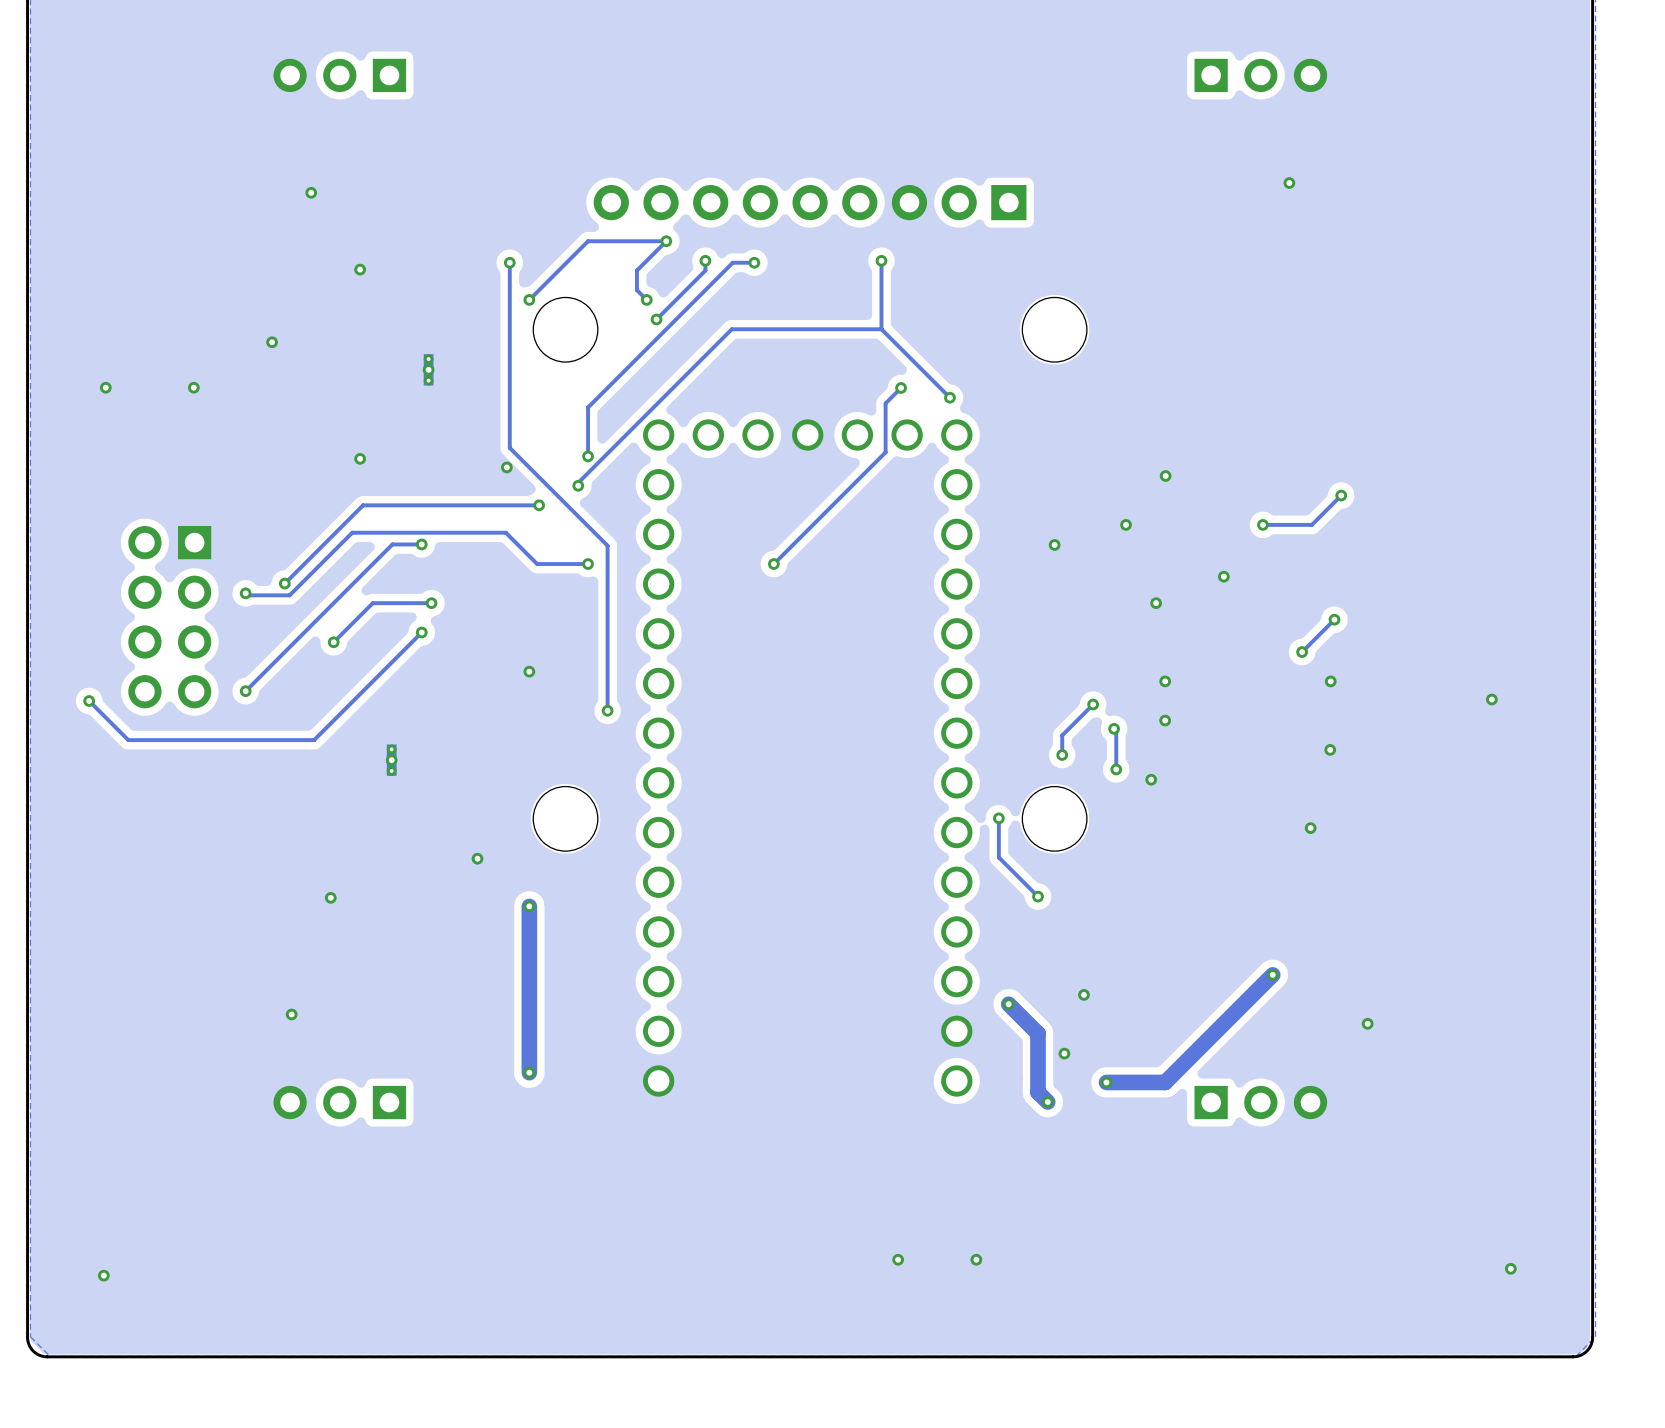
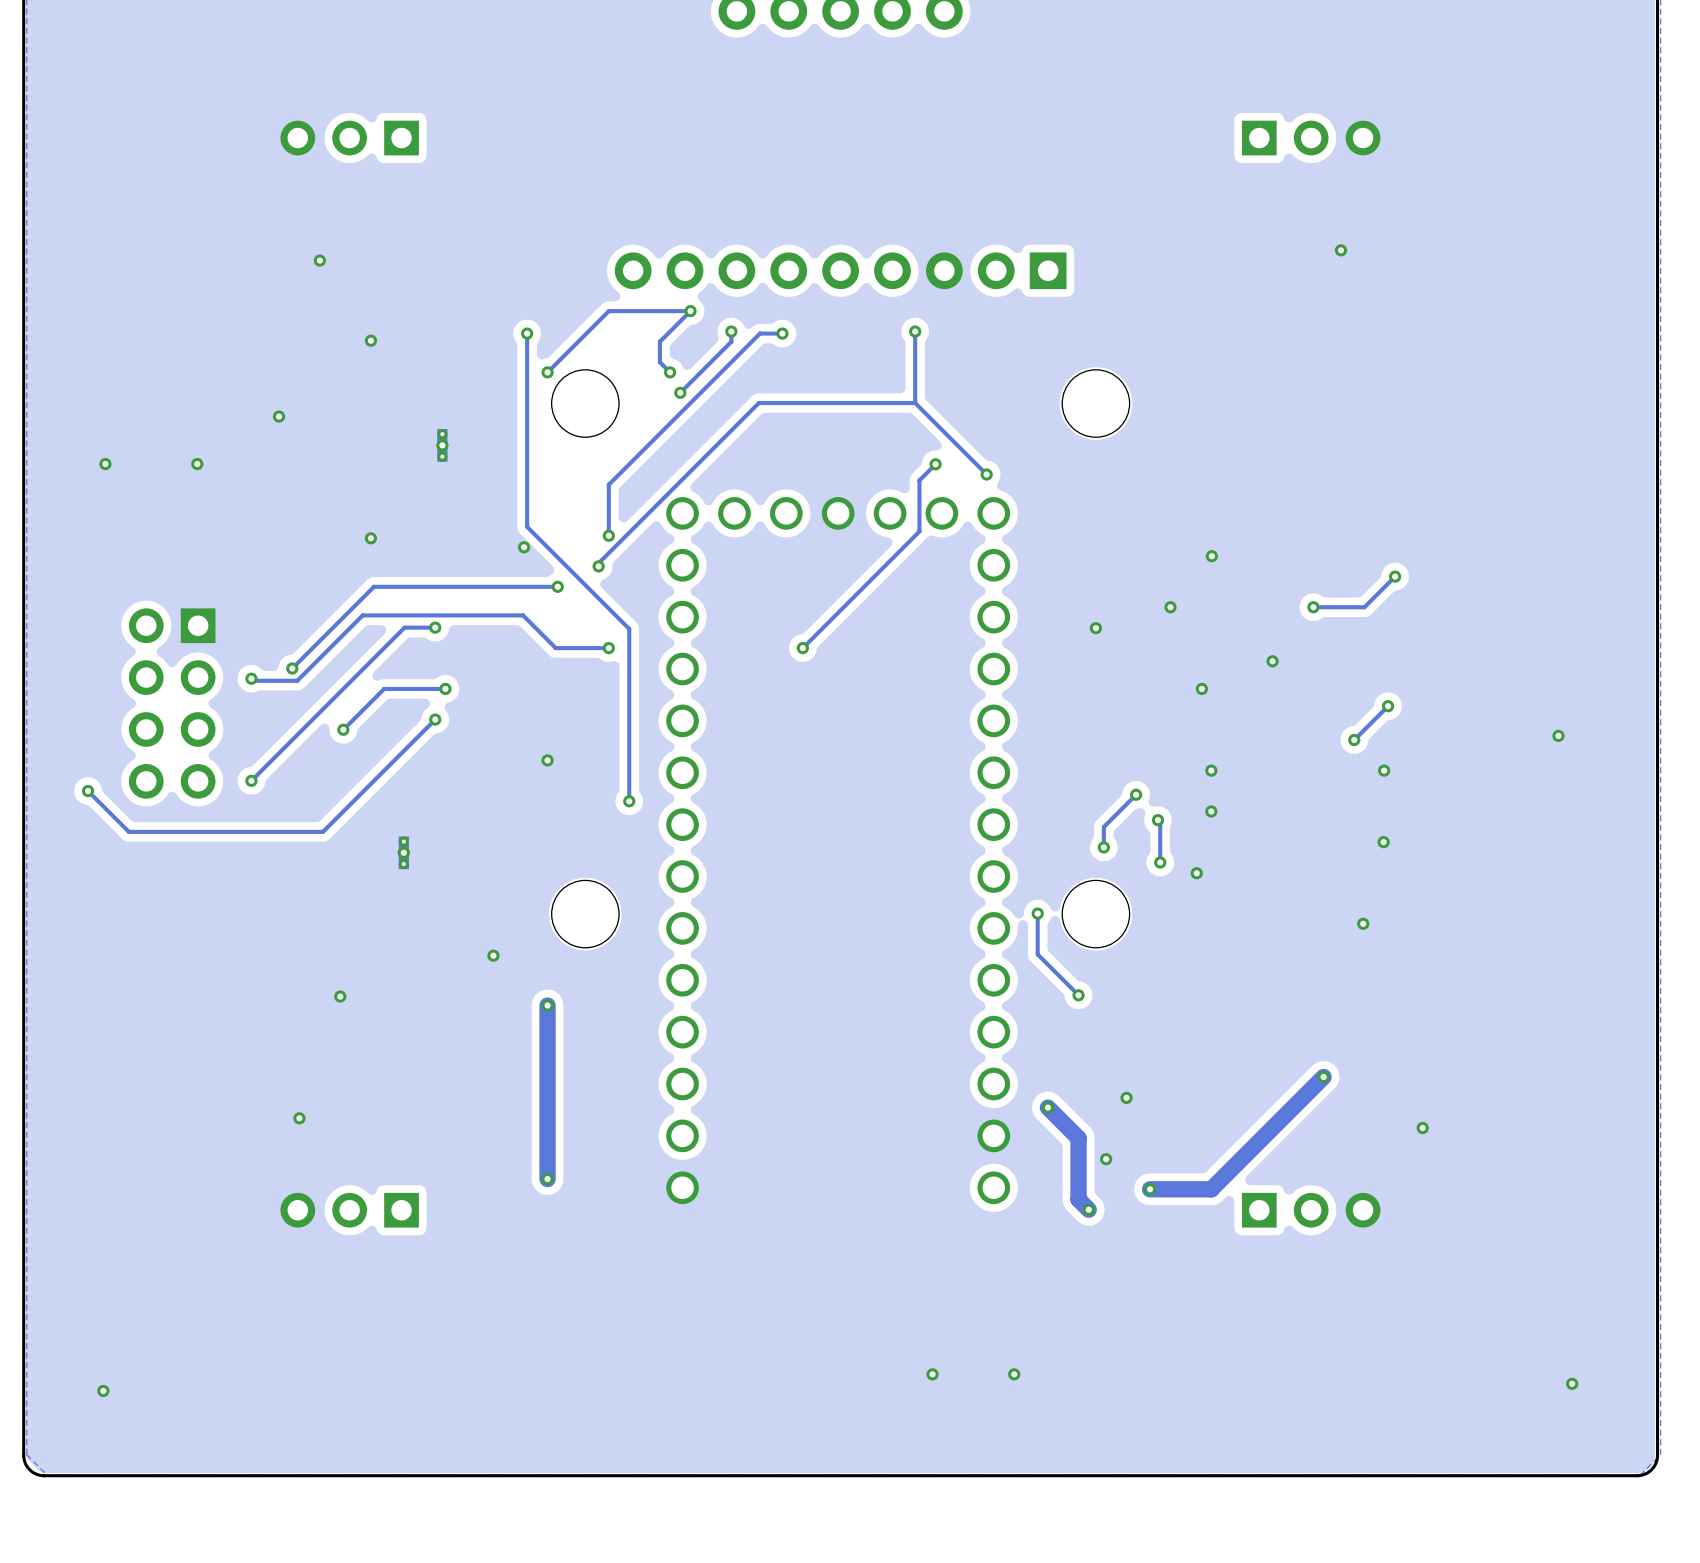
via position: (1491, 699) -> (1558, 735)

